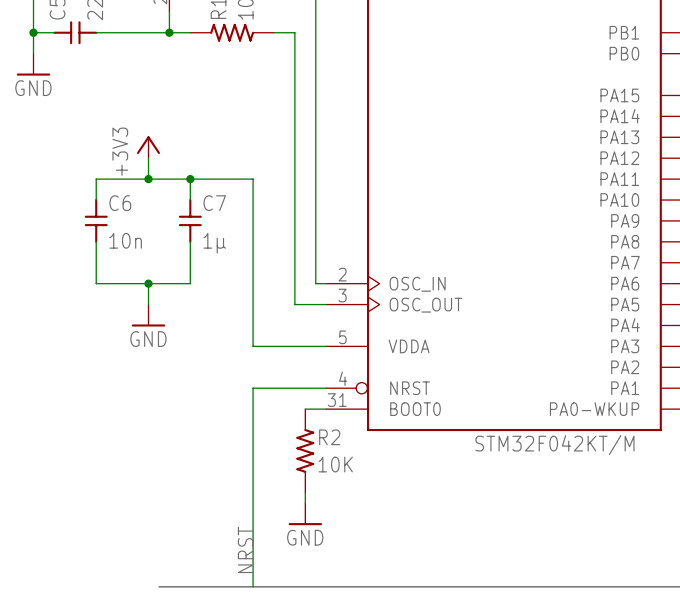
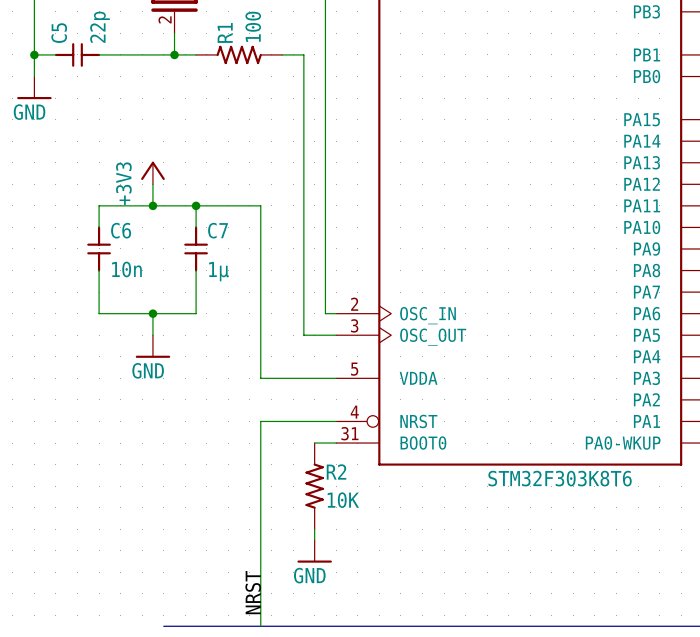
part value: STM32F042KT/M (554, 445) -> STM32F303K8T6 (560, 478)

